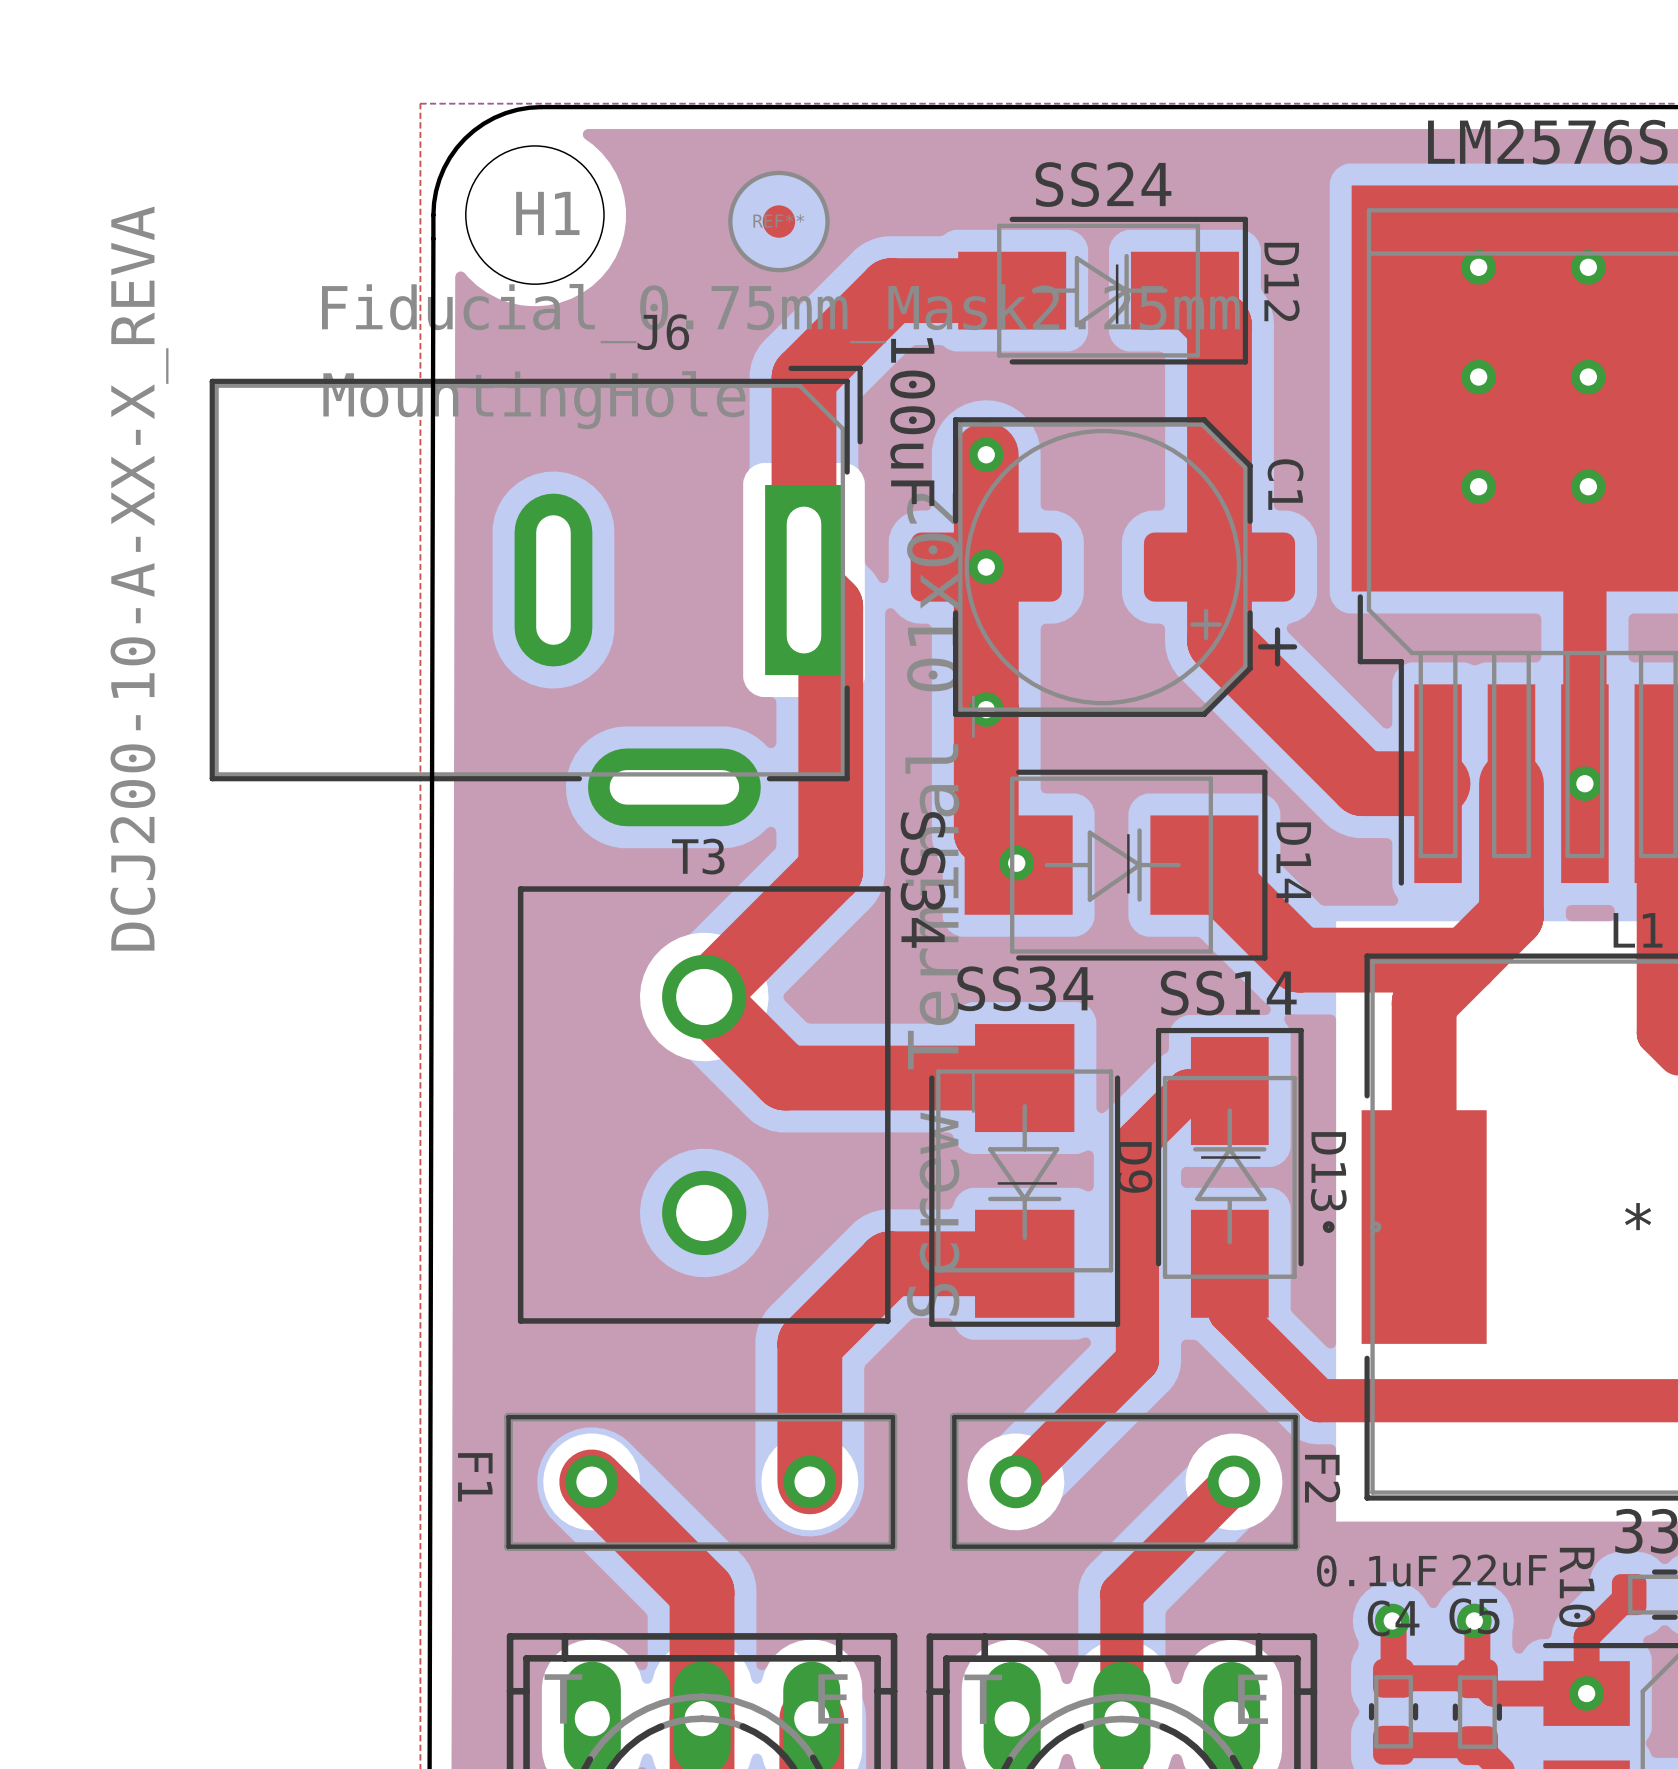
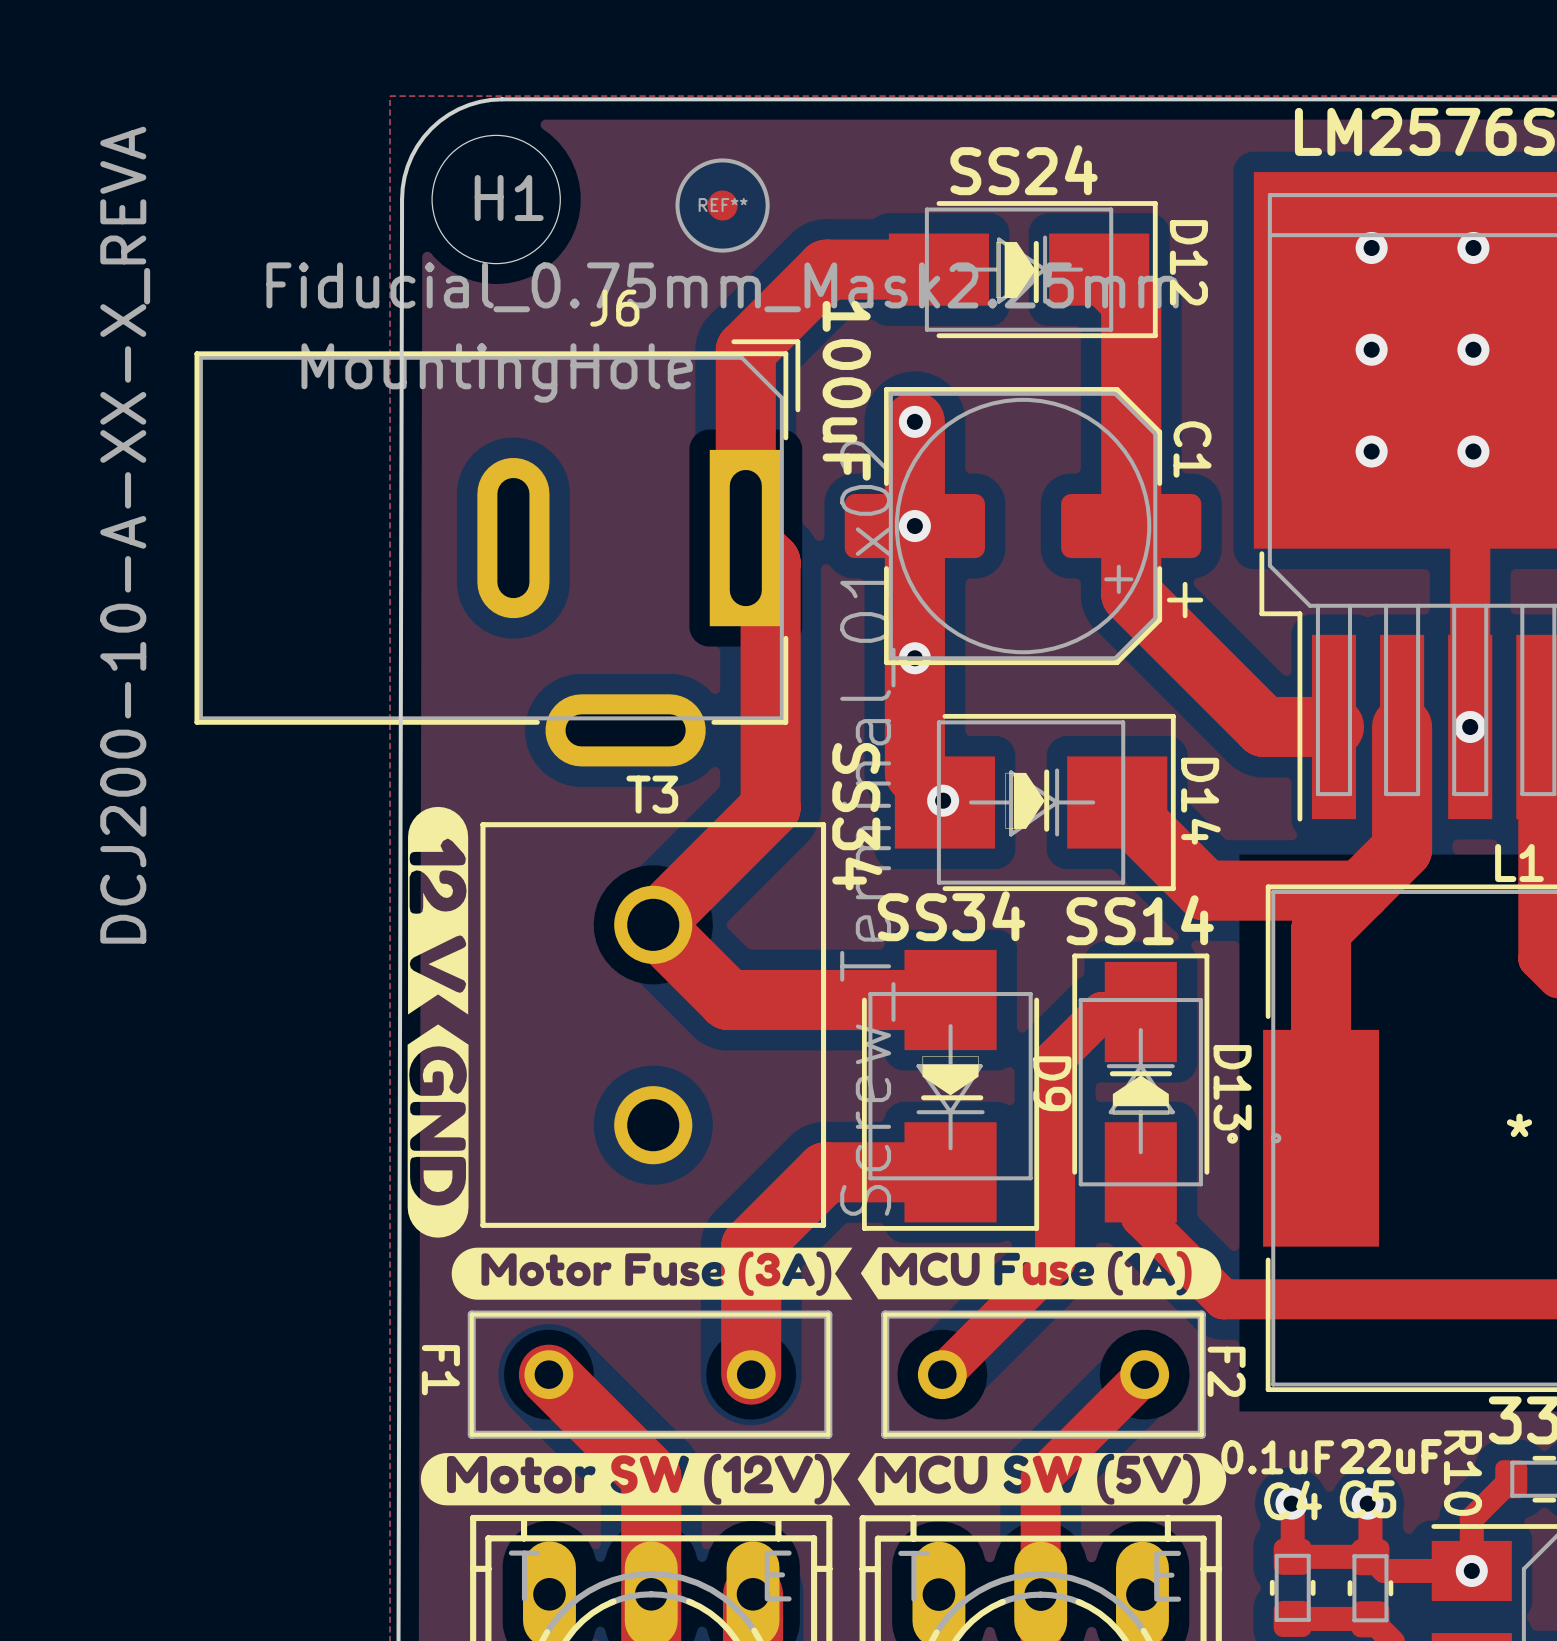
drawing: none -> [996, 242, 1036, 299]
drawing: none -> [1005, 772, 1045, 829]
drawing: none -> [407, 806, 1222, 1300]
drawing: none -> [922, 1056, 979, 1096]
drawing: none -> [1112, 1075, 1169, 1115]
drawing: none -> [420, 1453, 1227, 1506]

